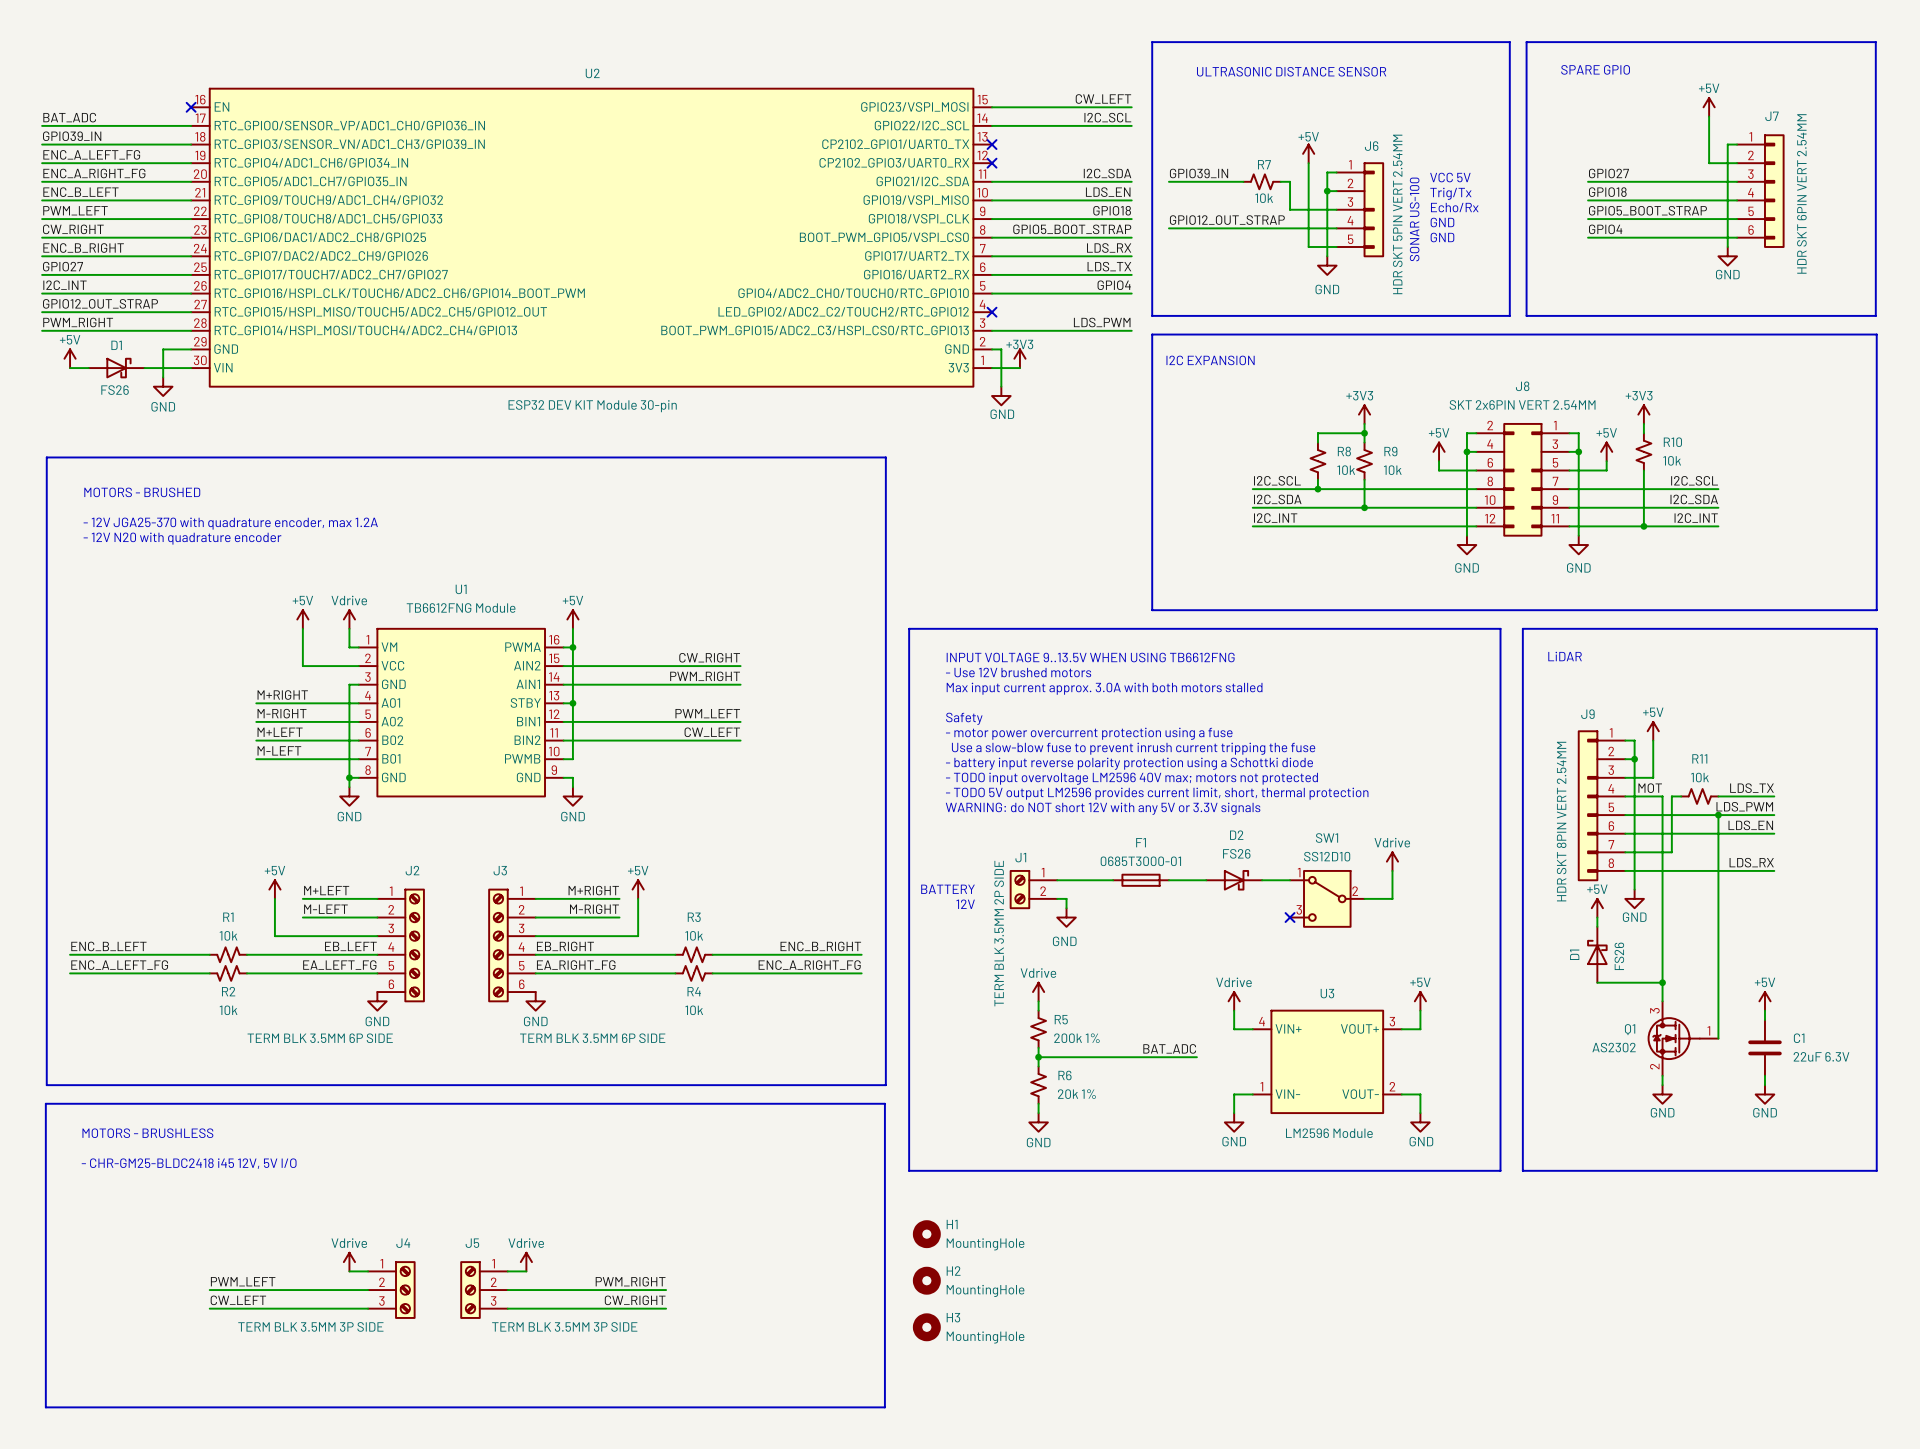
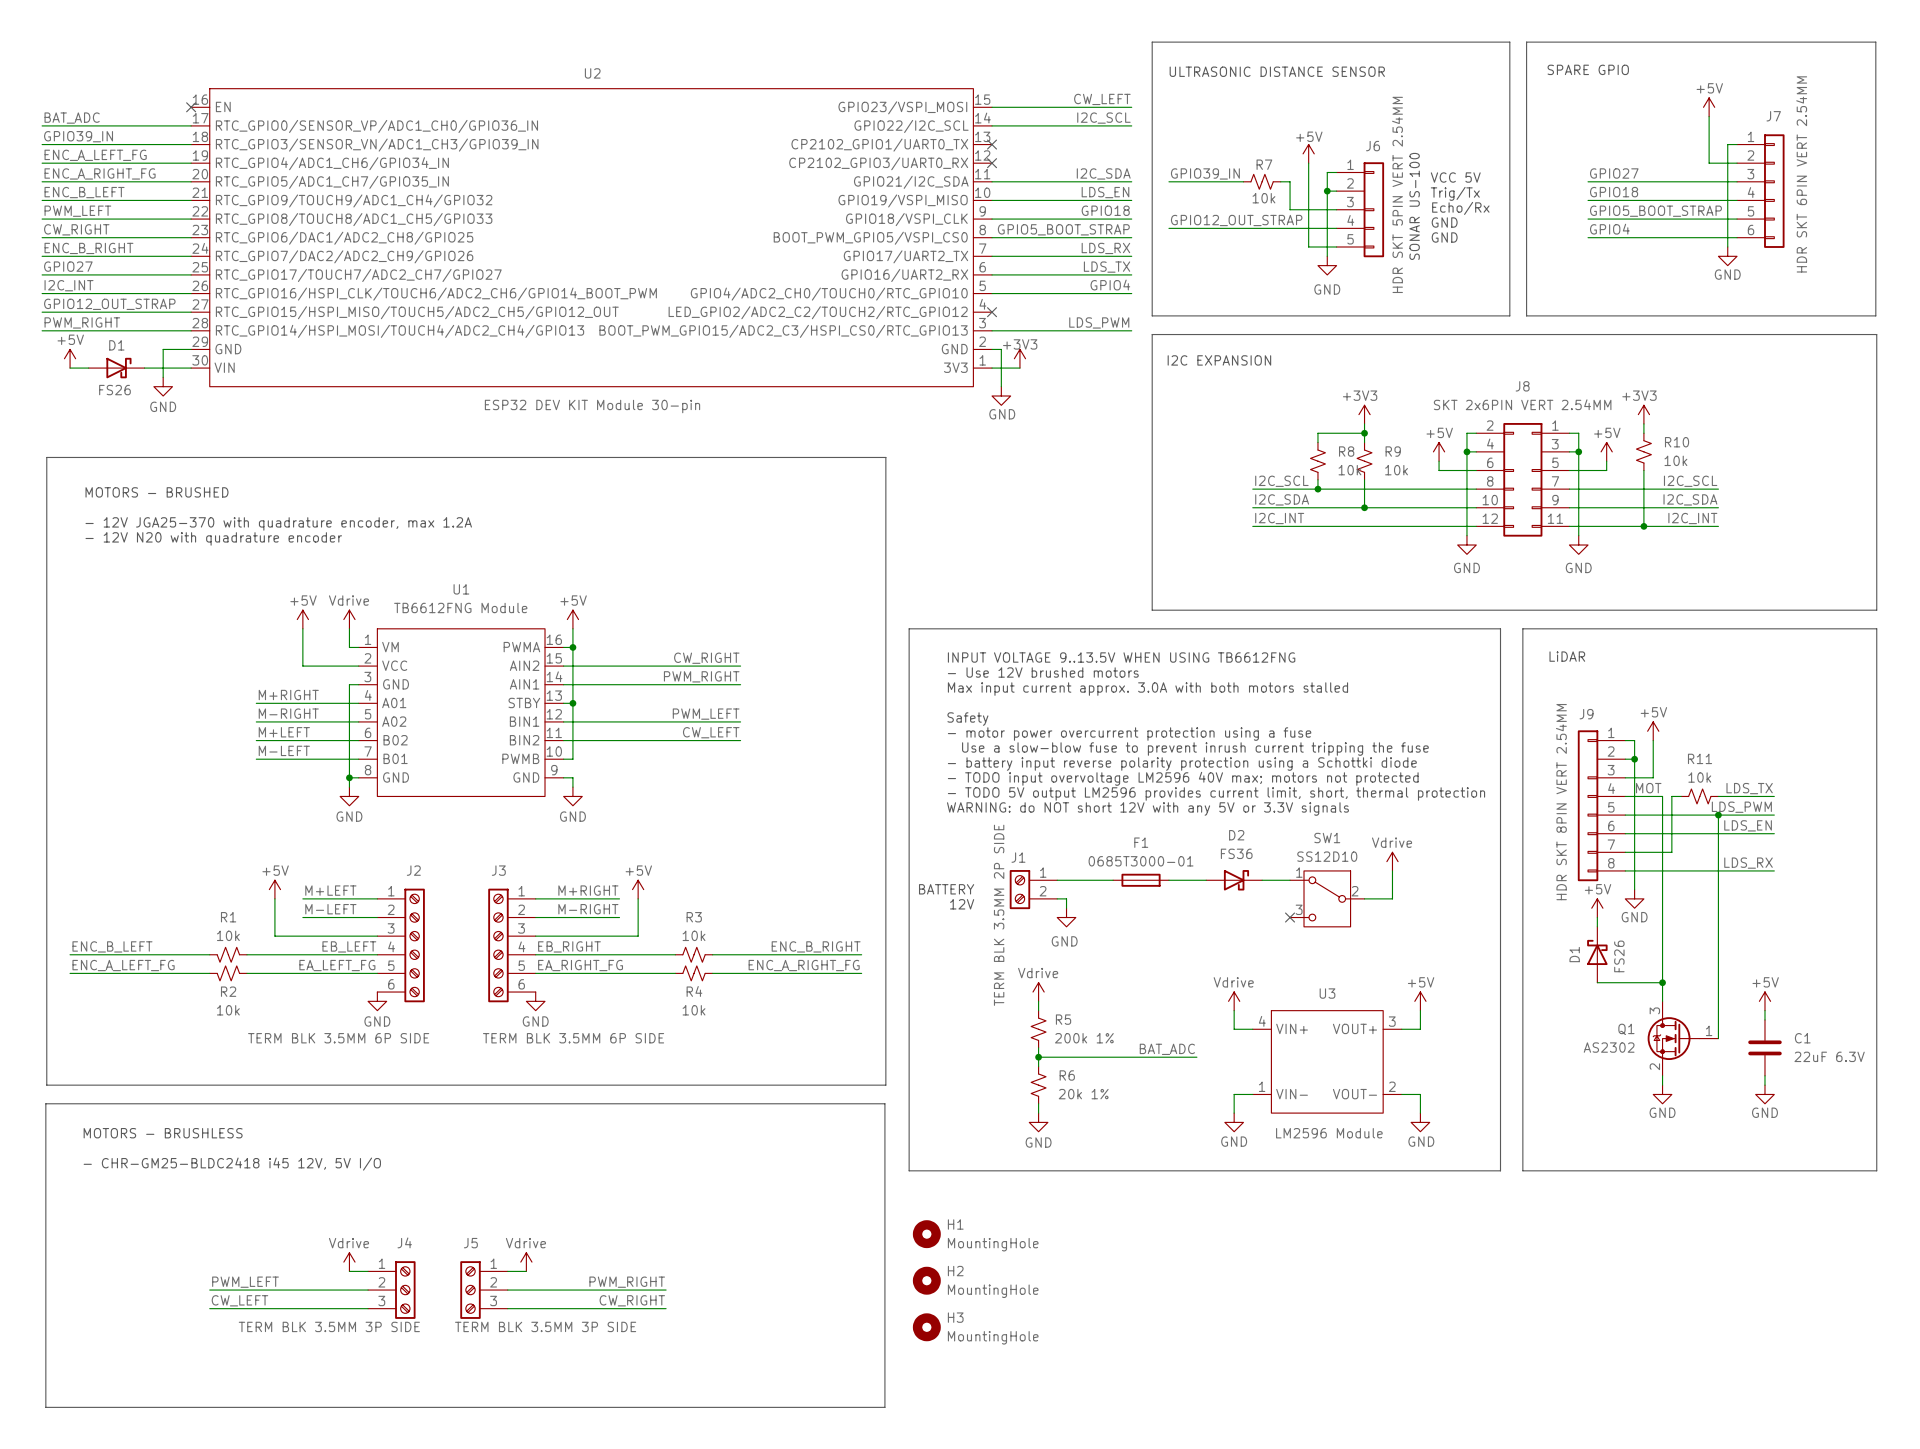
D2 value: FS26 (1236, 853) -> FS36 (1236, 853)

